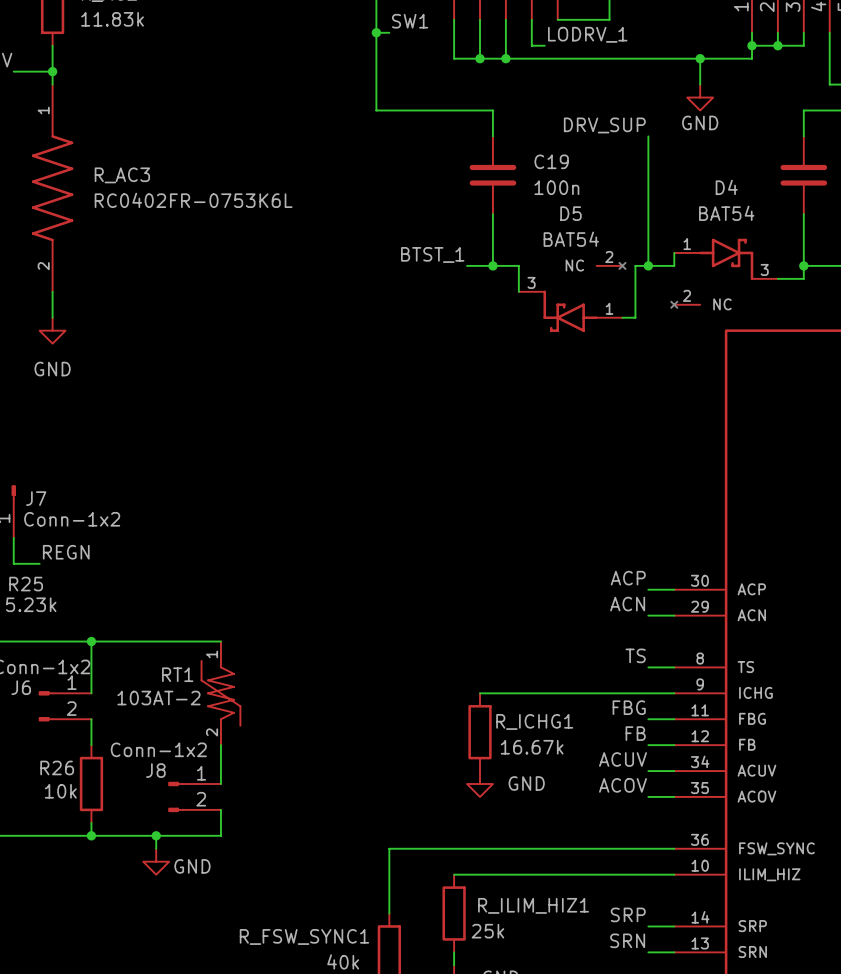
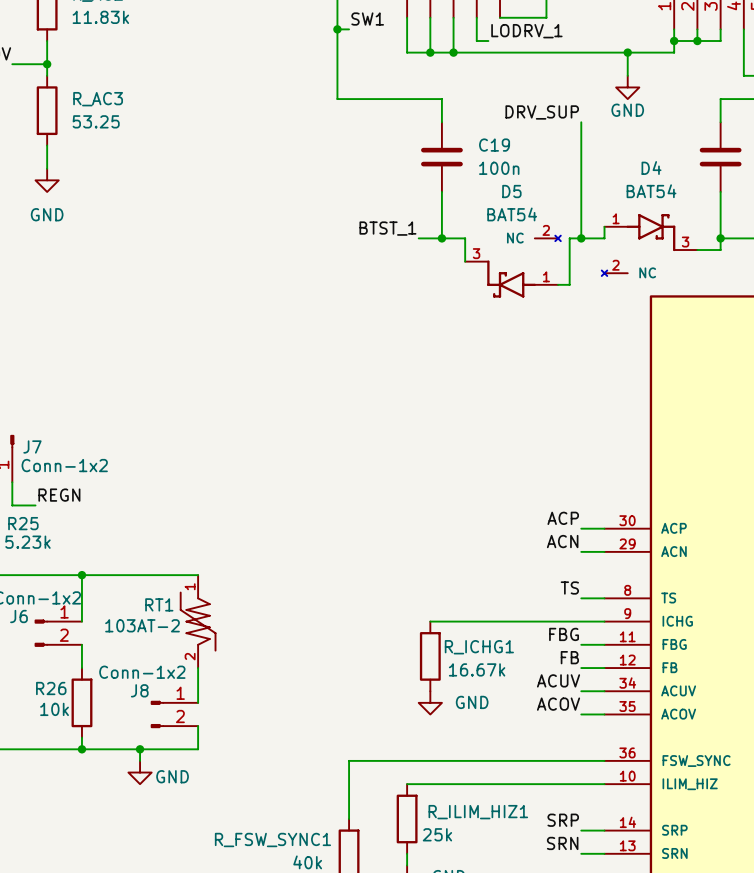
R_AC3 symbol: [31, 84, 74, 292] -> [36, 75, 58, 146]
R_AC3 value: RC0402FR-0753K6L (193, 200) -> 53.25 (96, 121)
wire: (52, 291) (52, 317) -> (47, 145) (47, 168)
power symbol position: GND (52, 330) -> GND (47, 180)

